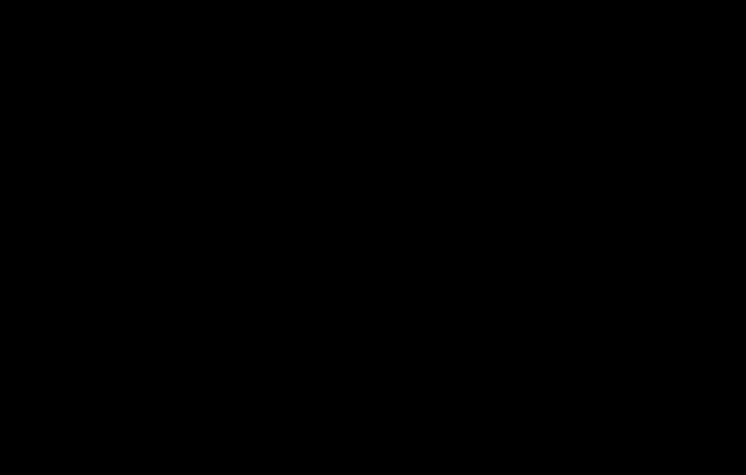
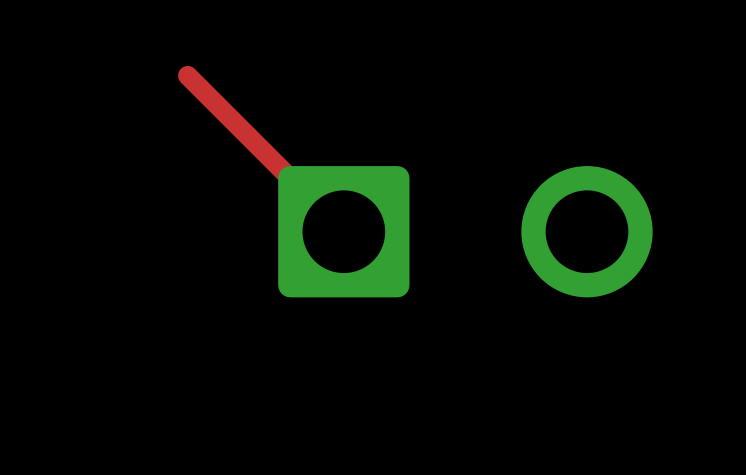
top track: none -> (187, 75) (343, 231)
part: none -> (465, 231)

